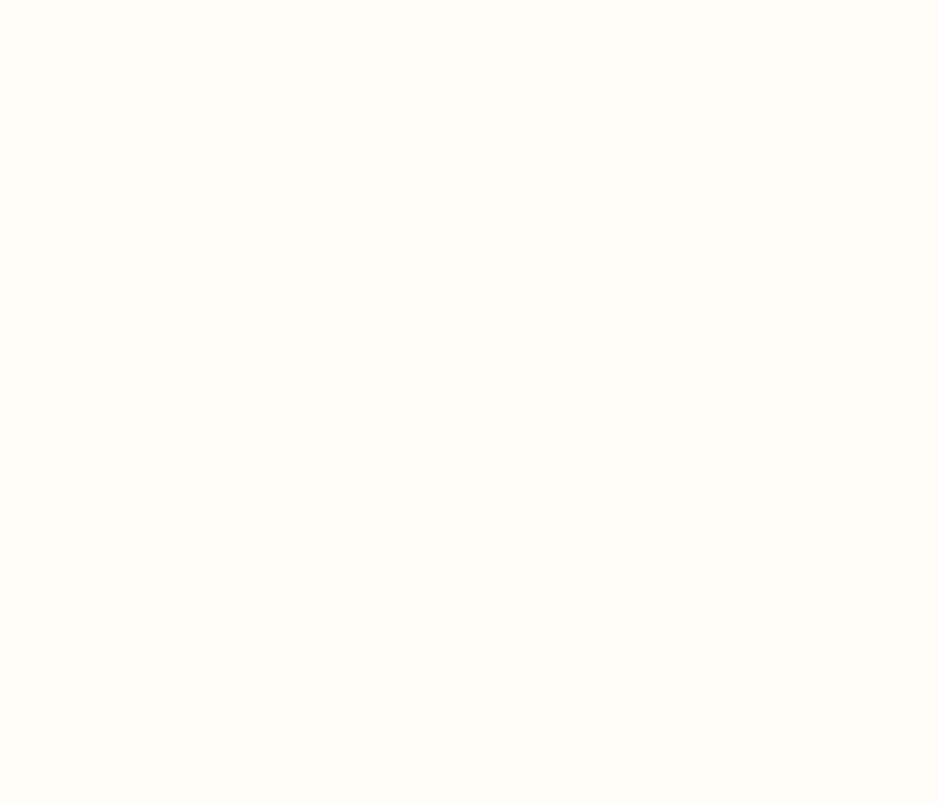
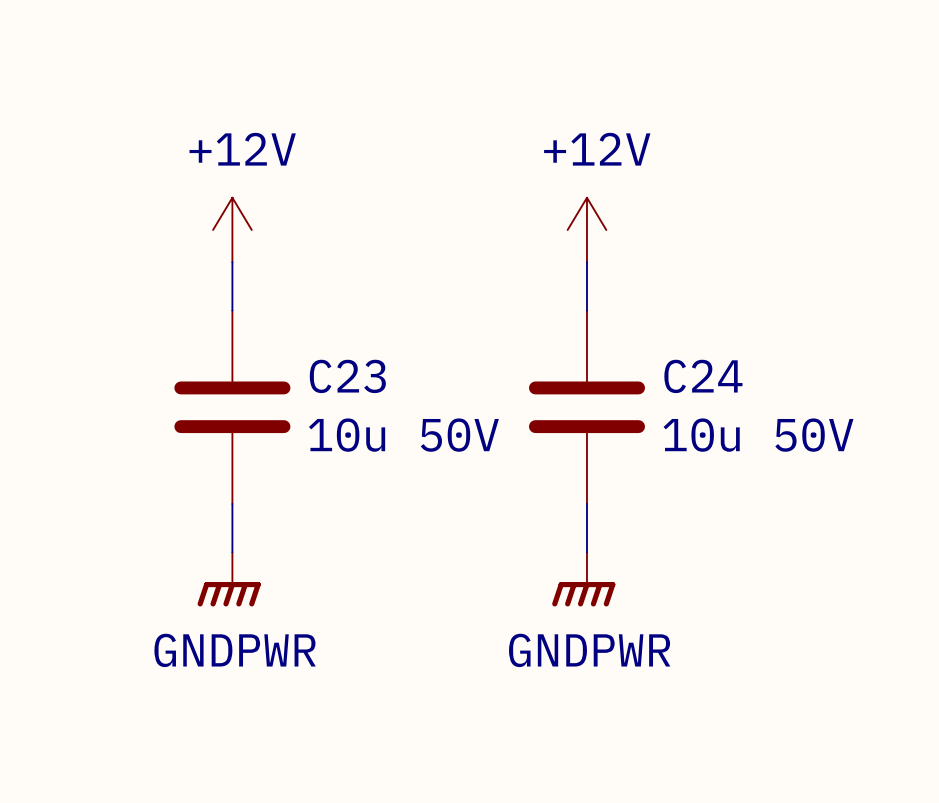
power symbol: none -> +12V (232, 229)
power symbol: none -> +12V (586, 229)
wire: none -> (232, 262) (232, 310)
wire: none -> (586, 262) (586, 310)
C23: none -> 10u 50V (232, 407)
C24: none -> 10u 50V (586, 407)
wire: none -> (232, 503) (232, 552)
wire: none -> (586, 503) (586, 552)
power symbol: none -> GNDPWR (229, 579)
power symbol: none -> GNDPWR (583, 579)

